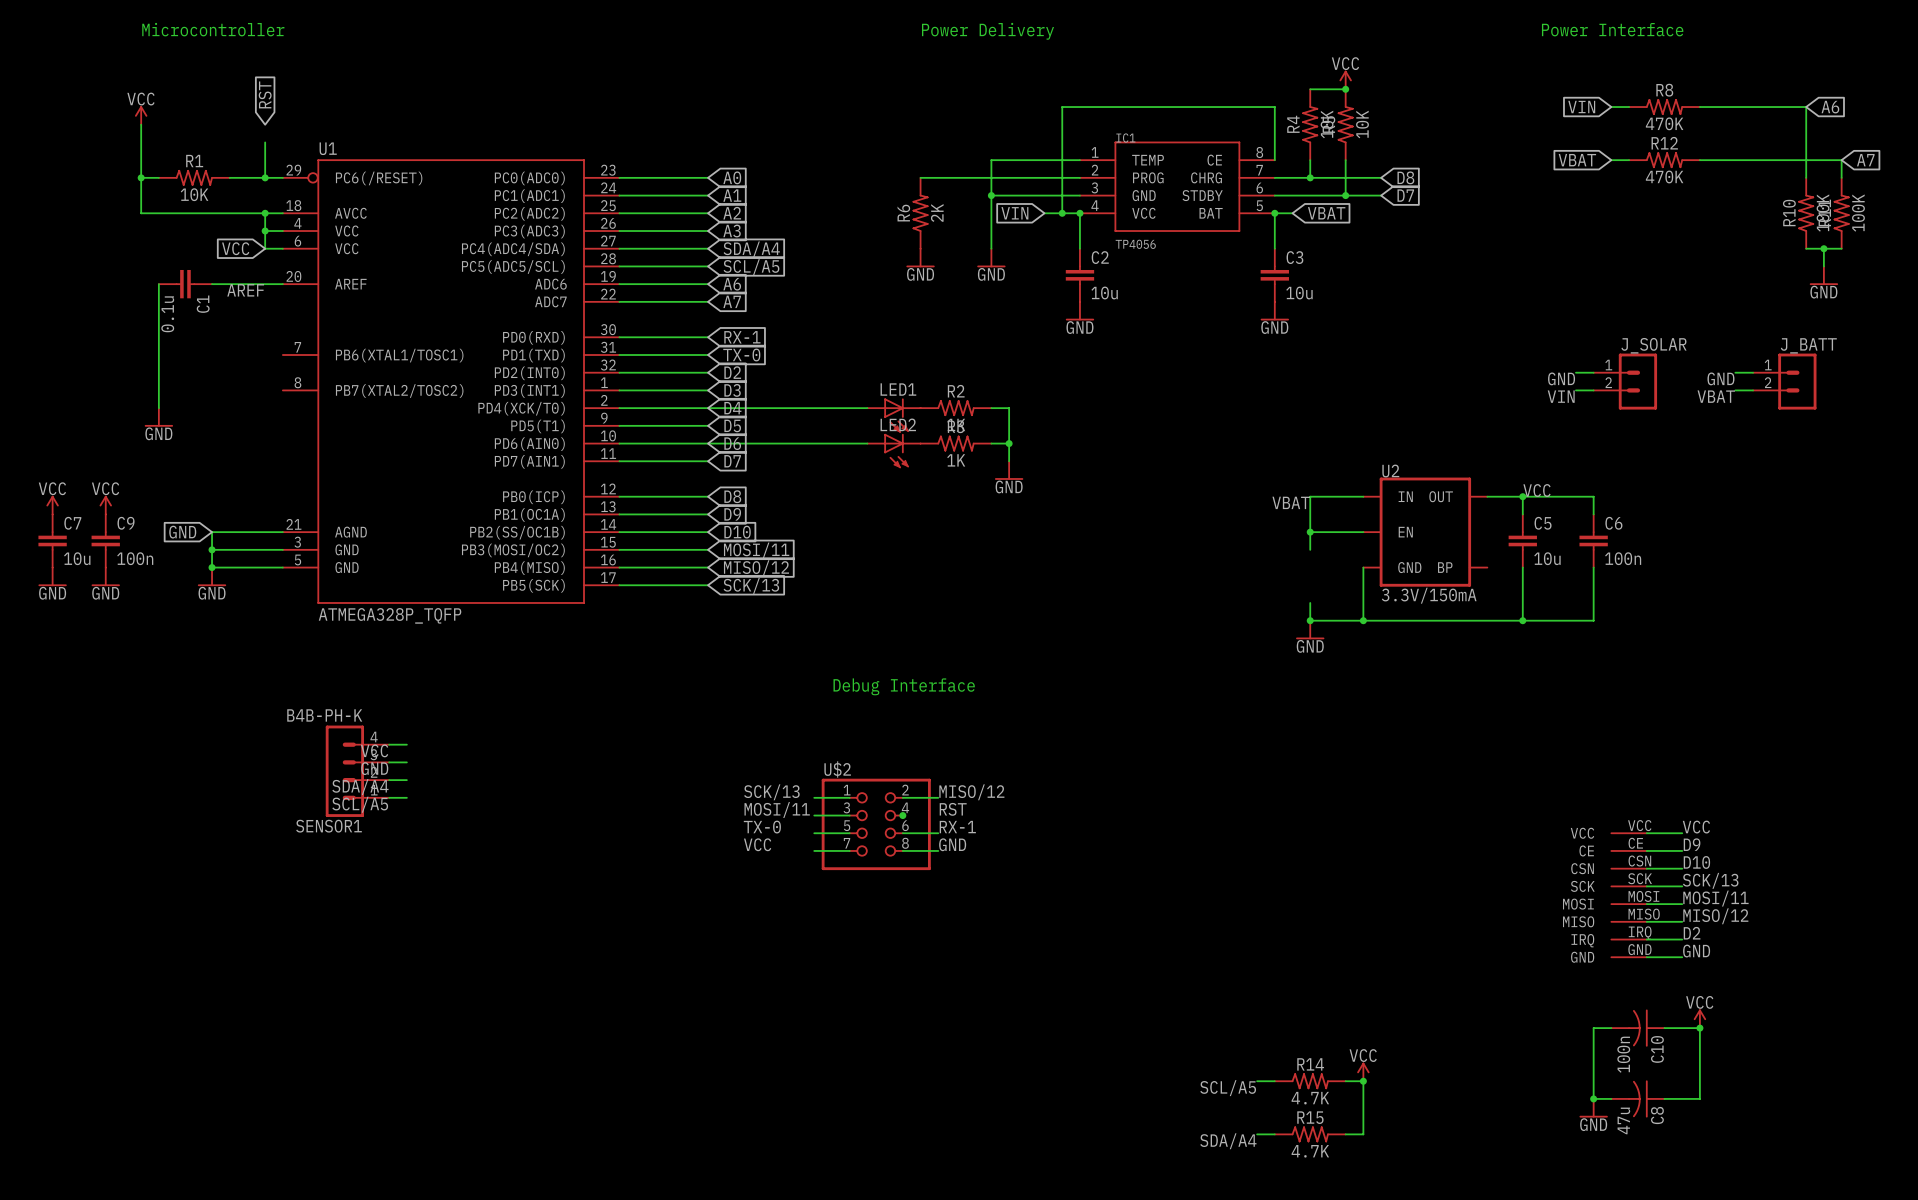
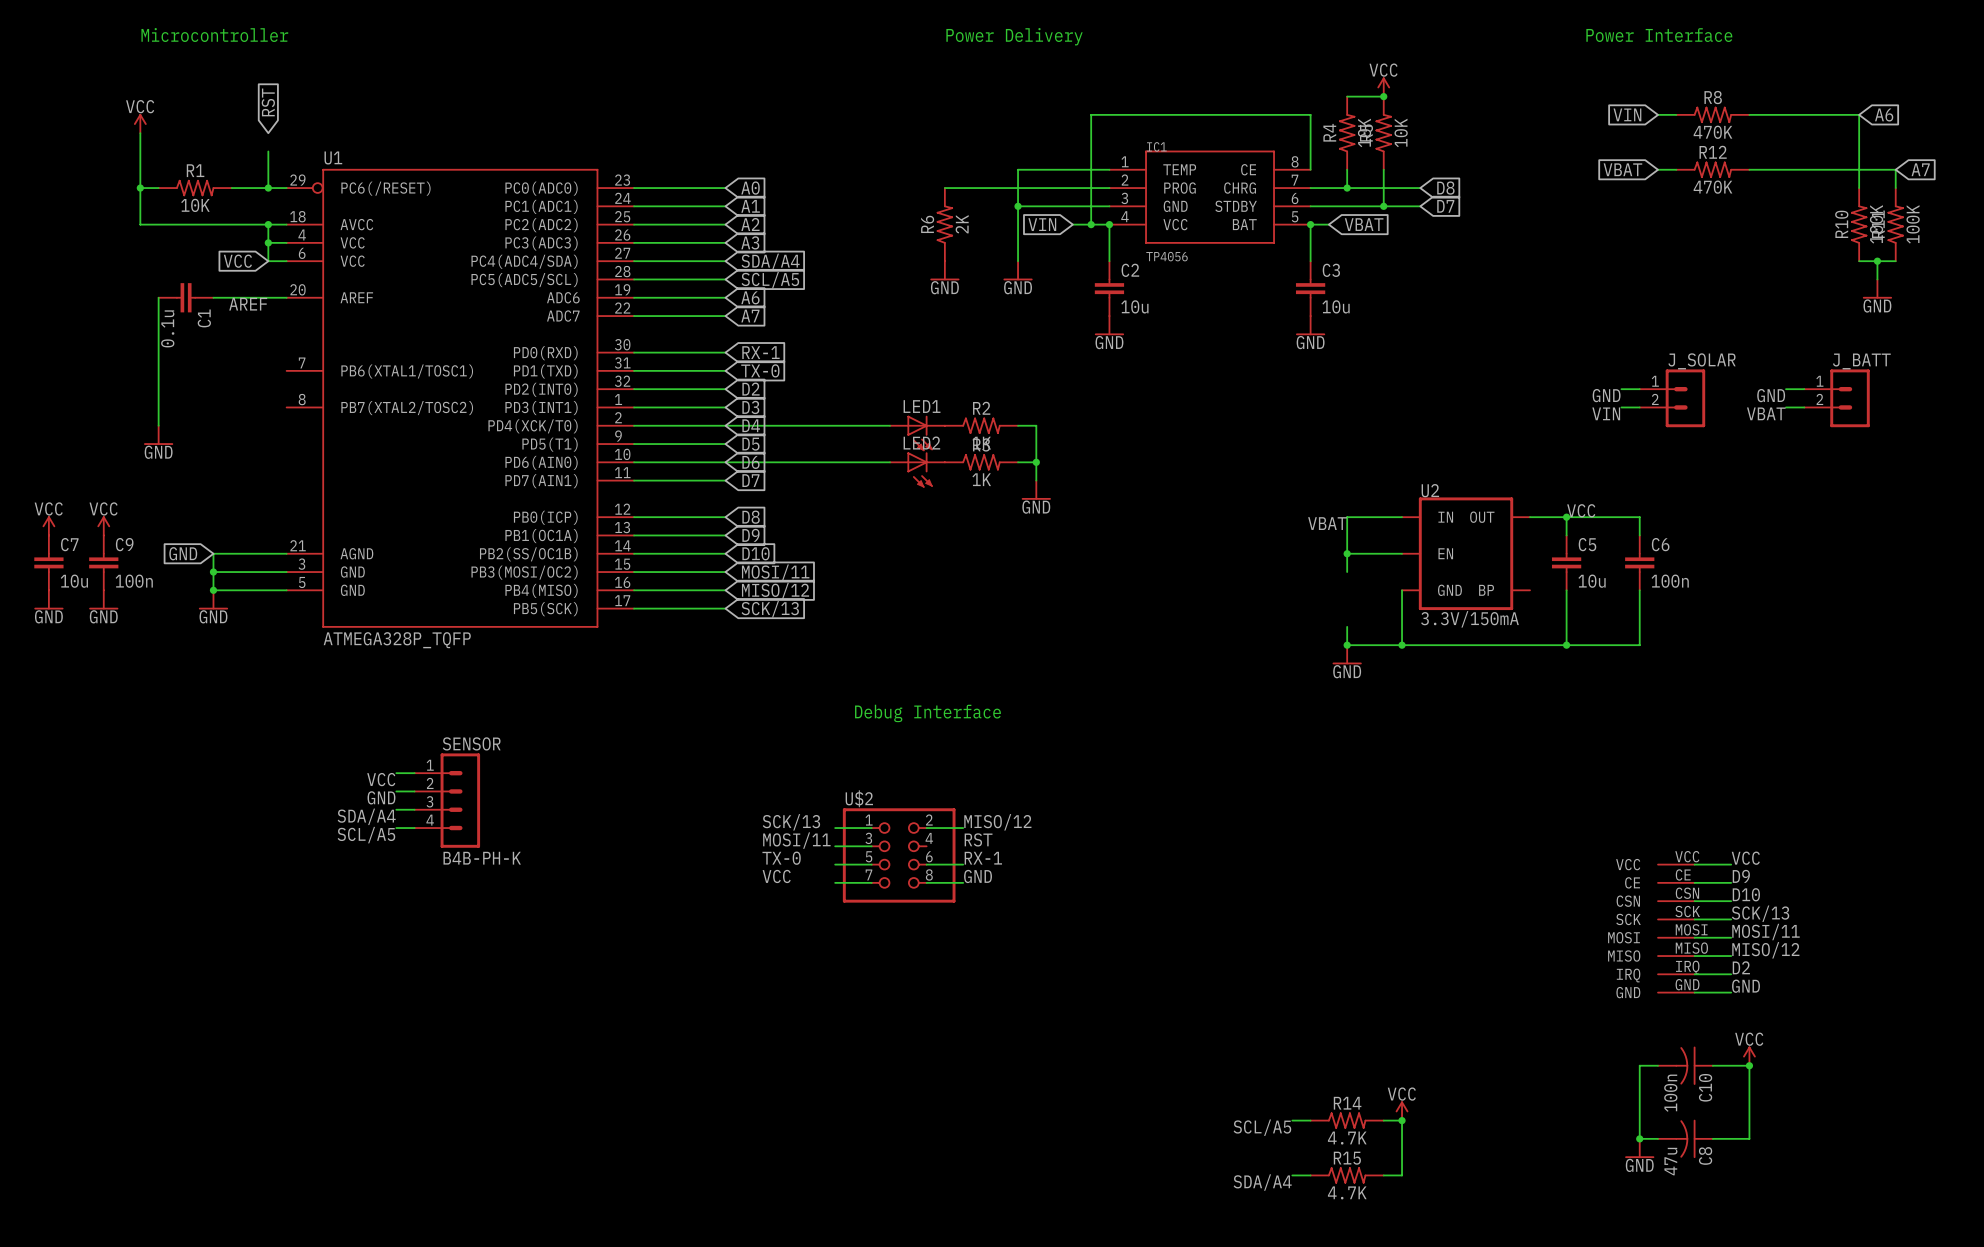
SENSOR1: B4B-PH-K (357, 771) -> none
SENSOR: none -> B4B-PH-K (447, 800)
junction: (902, 815) -> none

